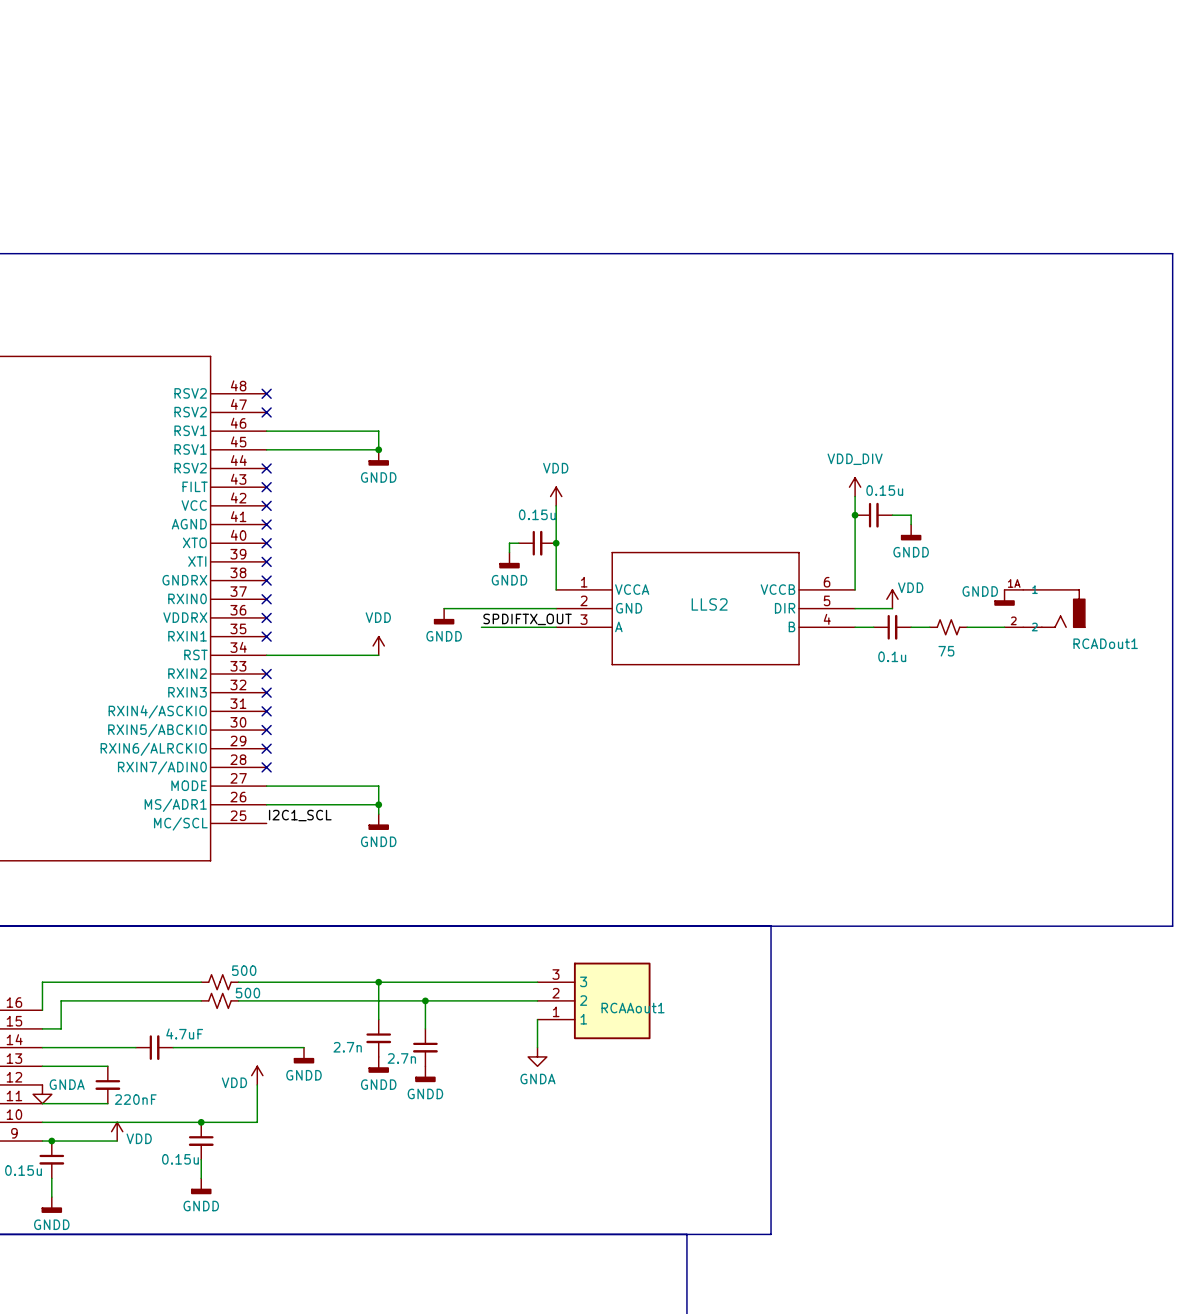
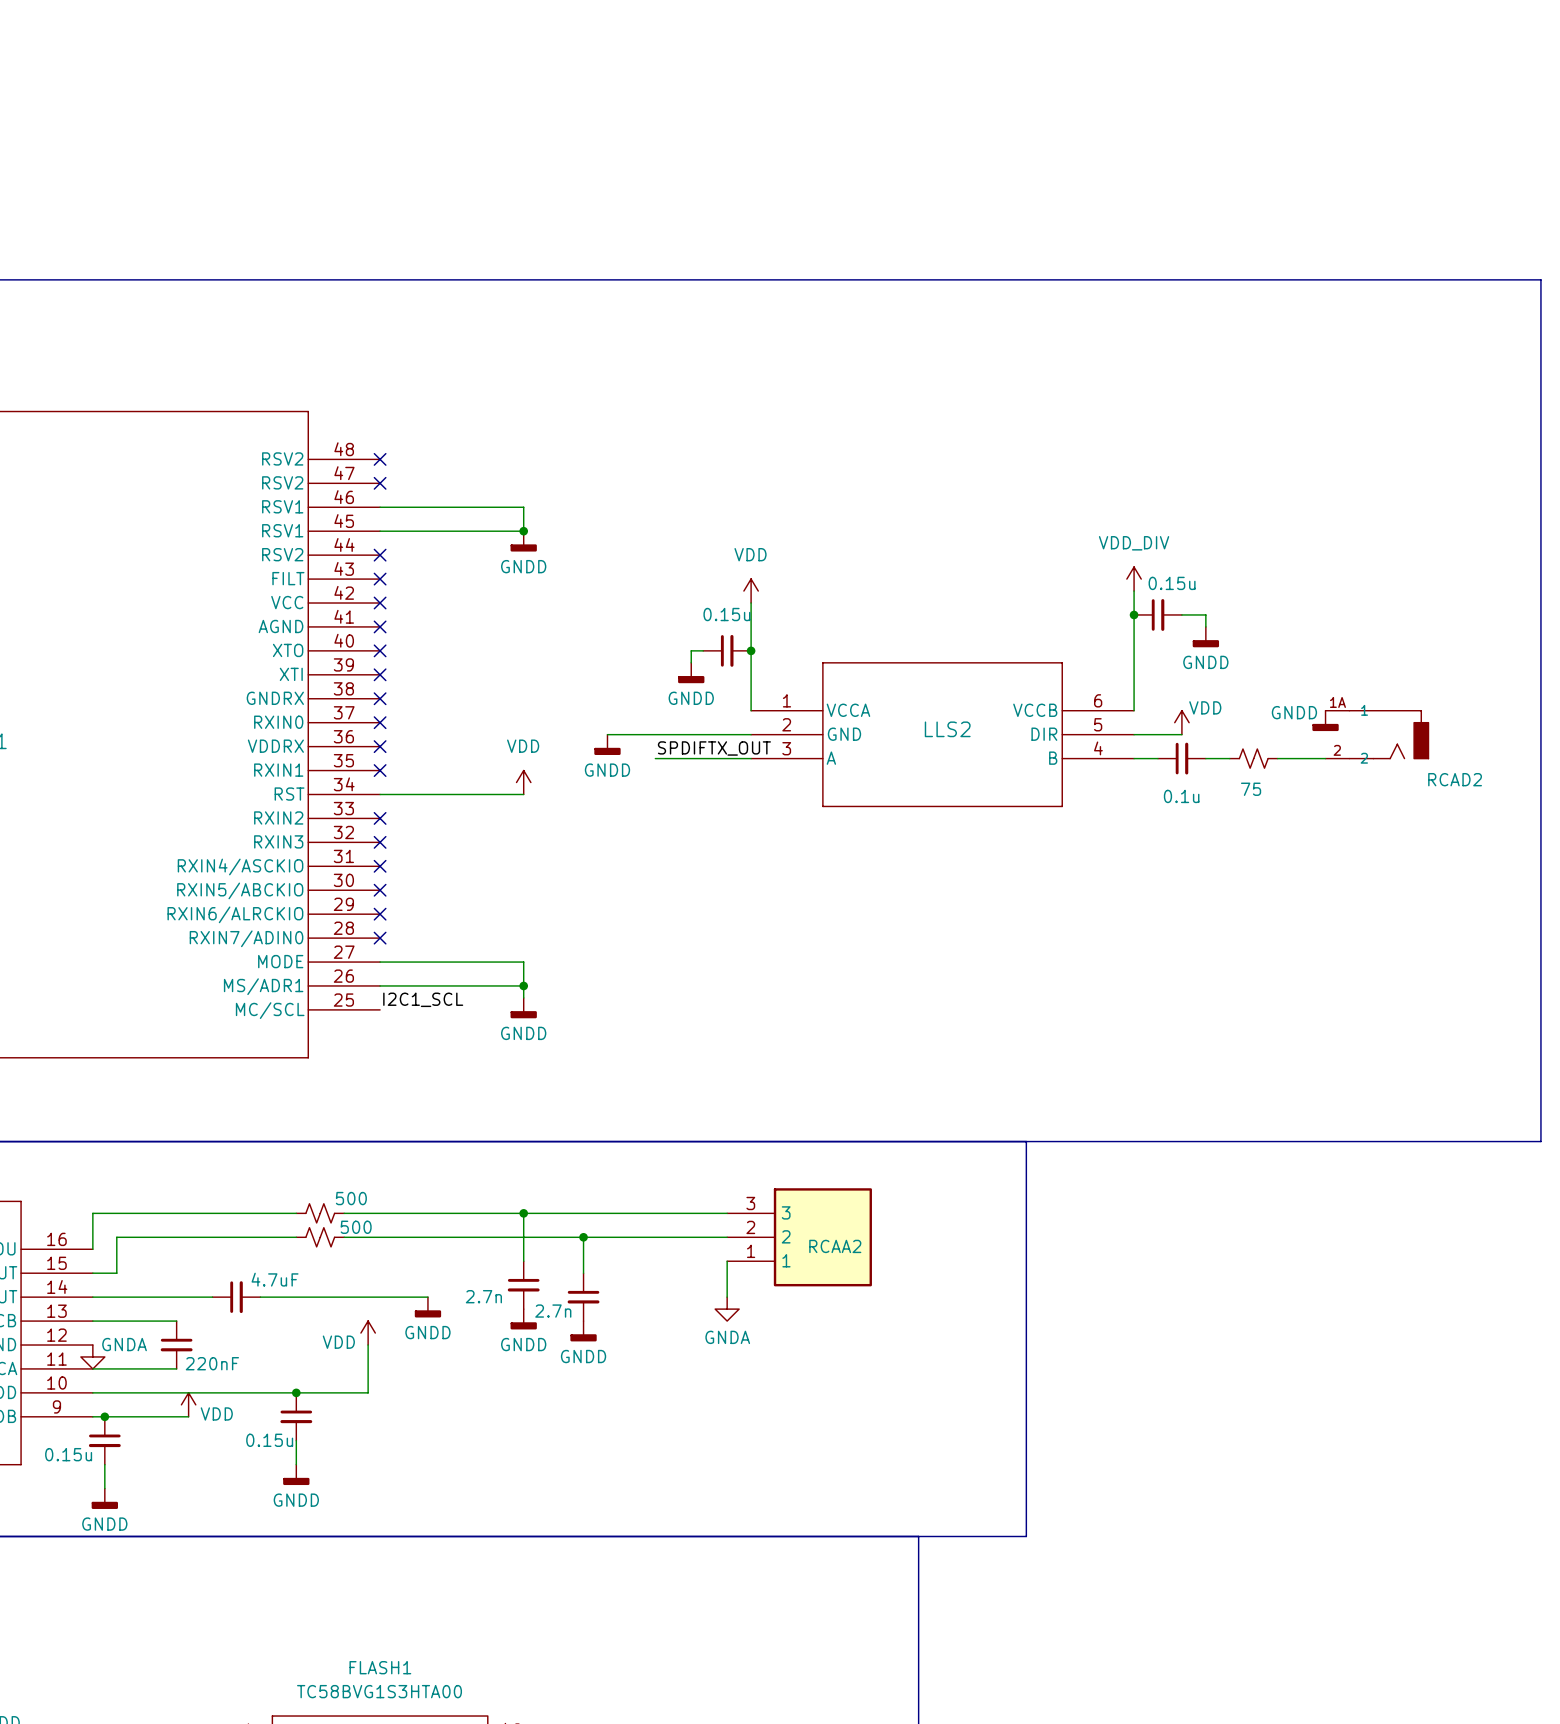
RCADout1 name: RCADout1 (1105, 643) -> RCAD2 (1455, 779)
RCAAout1 name: RCAAout1 (633, 1008) -> RCAA2 (835, 1246)

